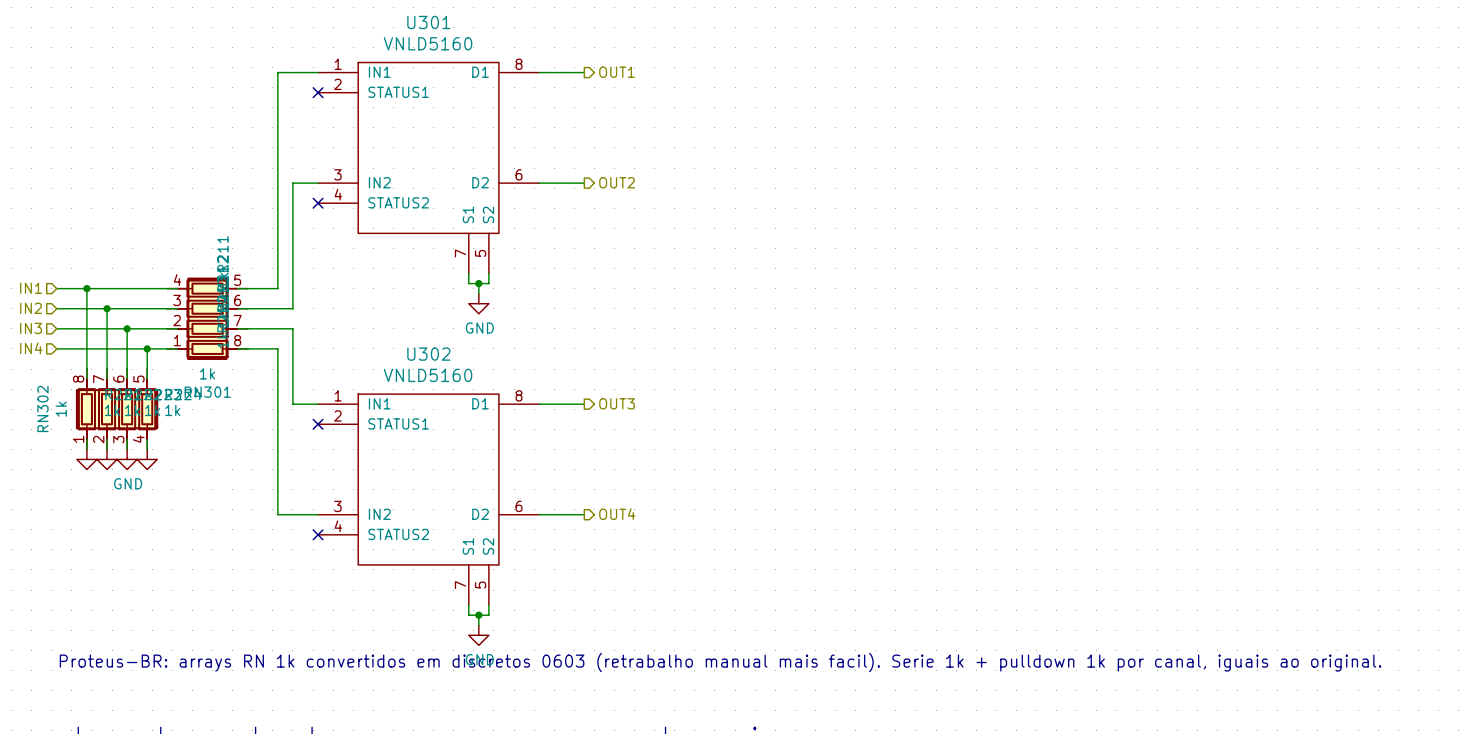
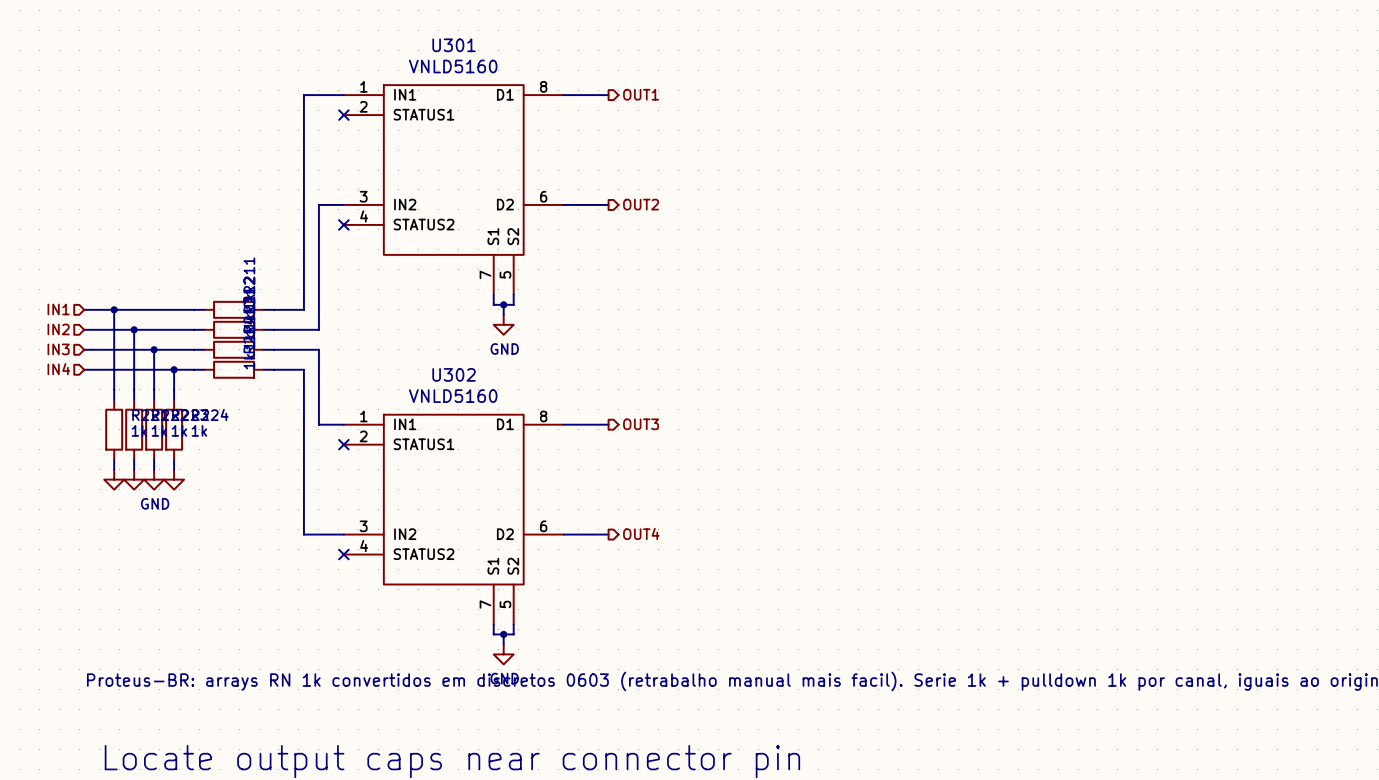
RN301: 1k (207, 318) -> none
RN302: 1k (117, 409) -> none

